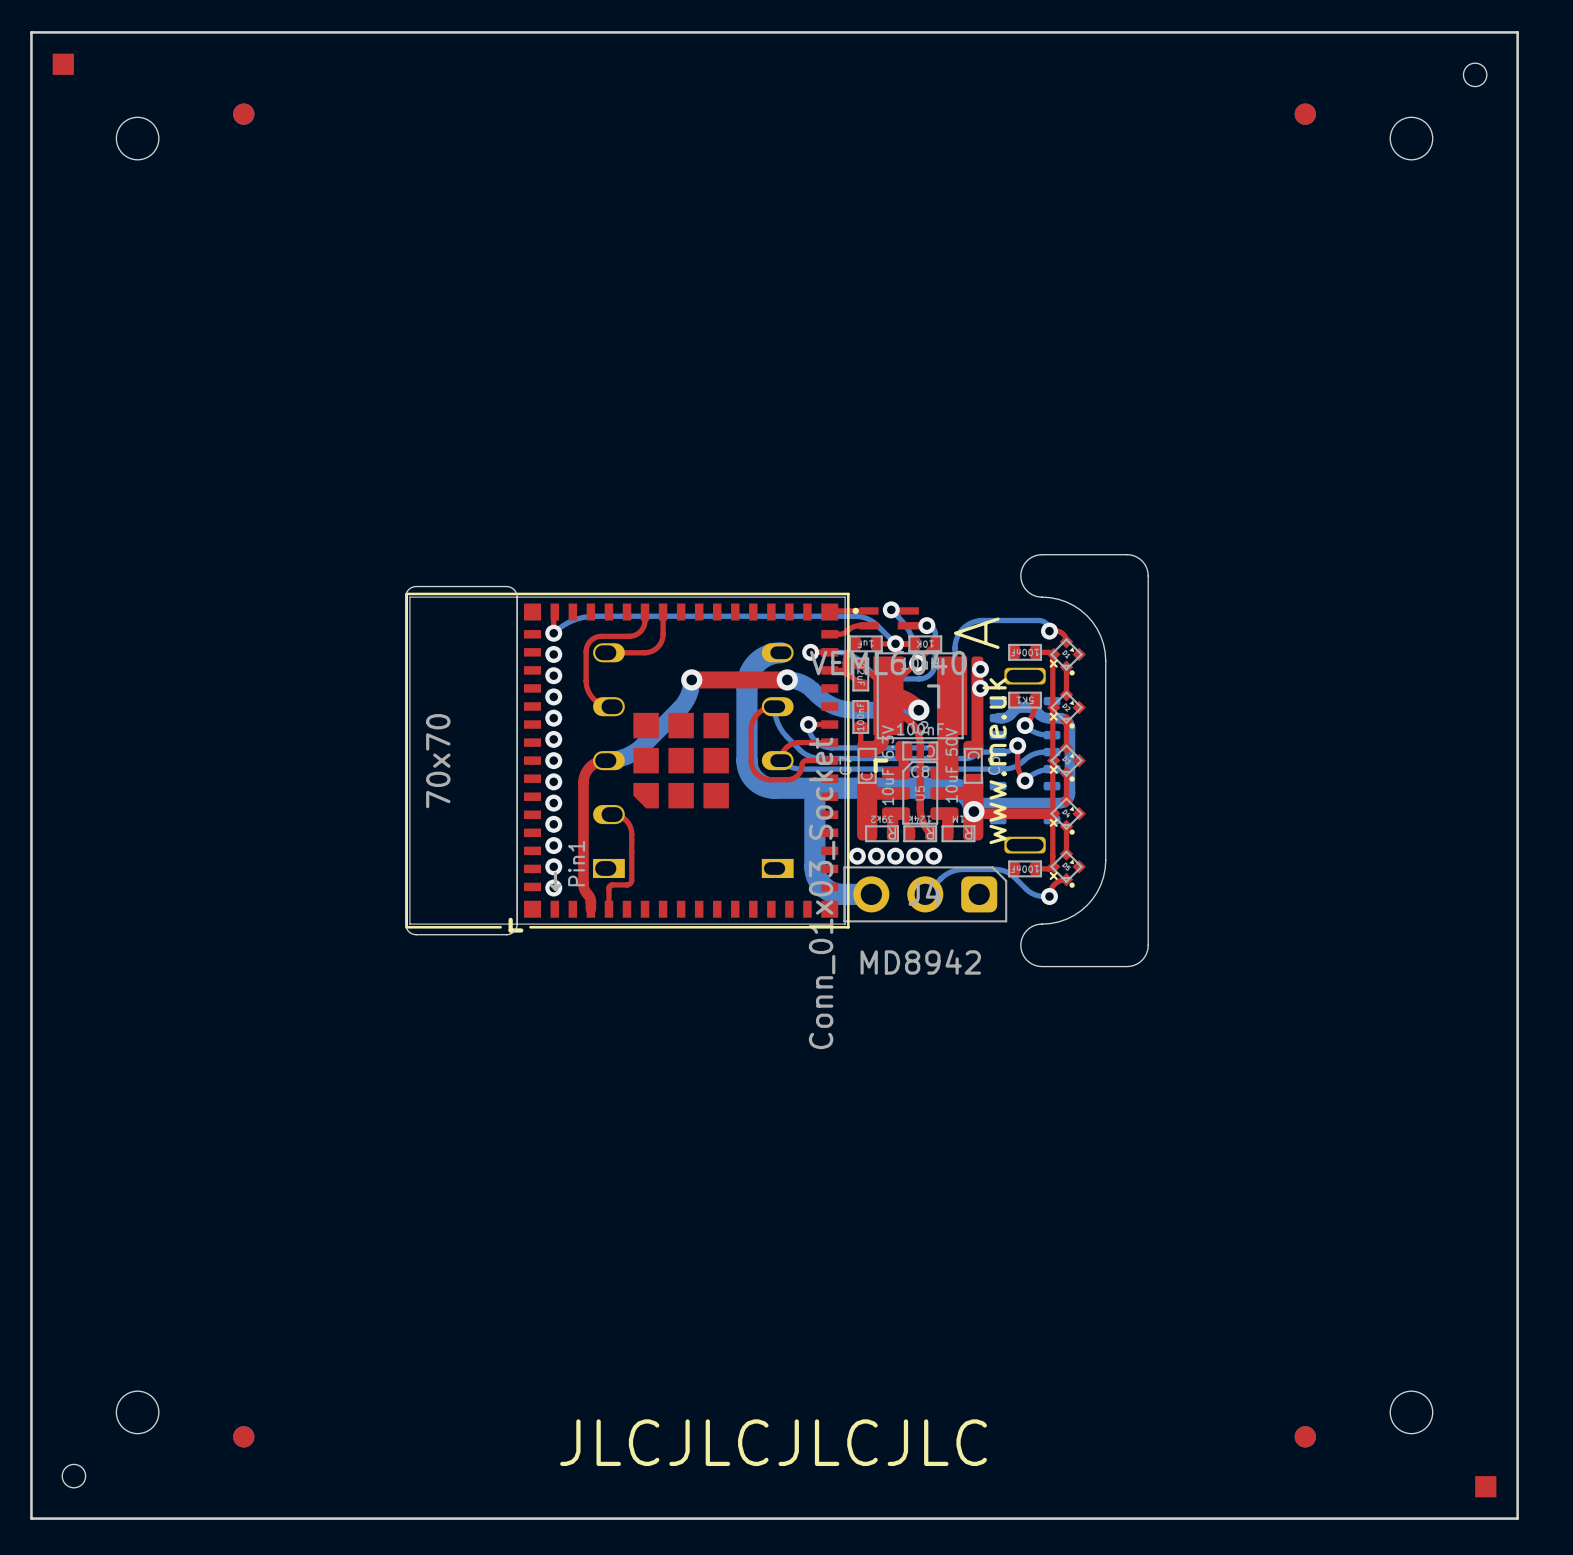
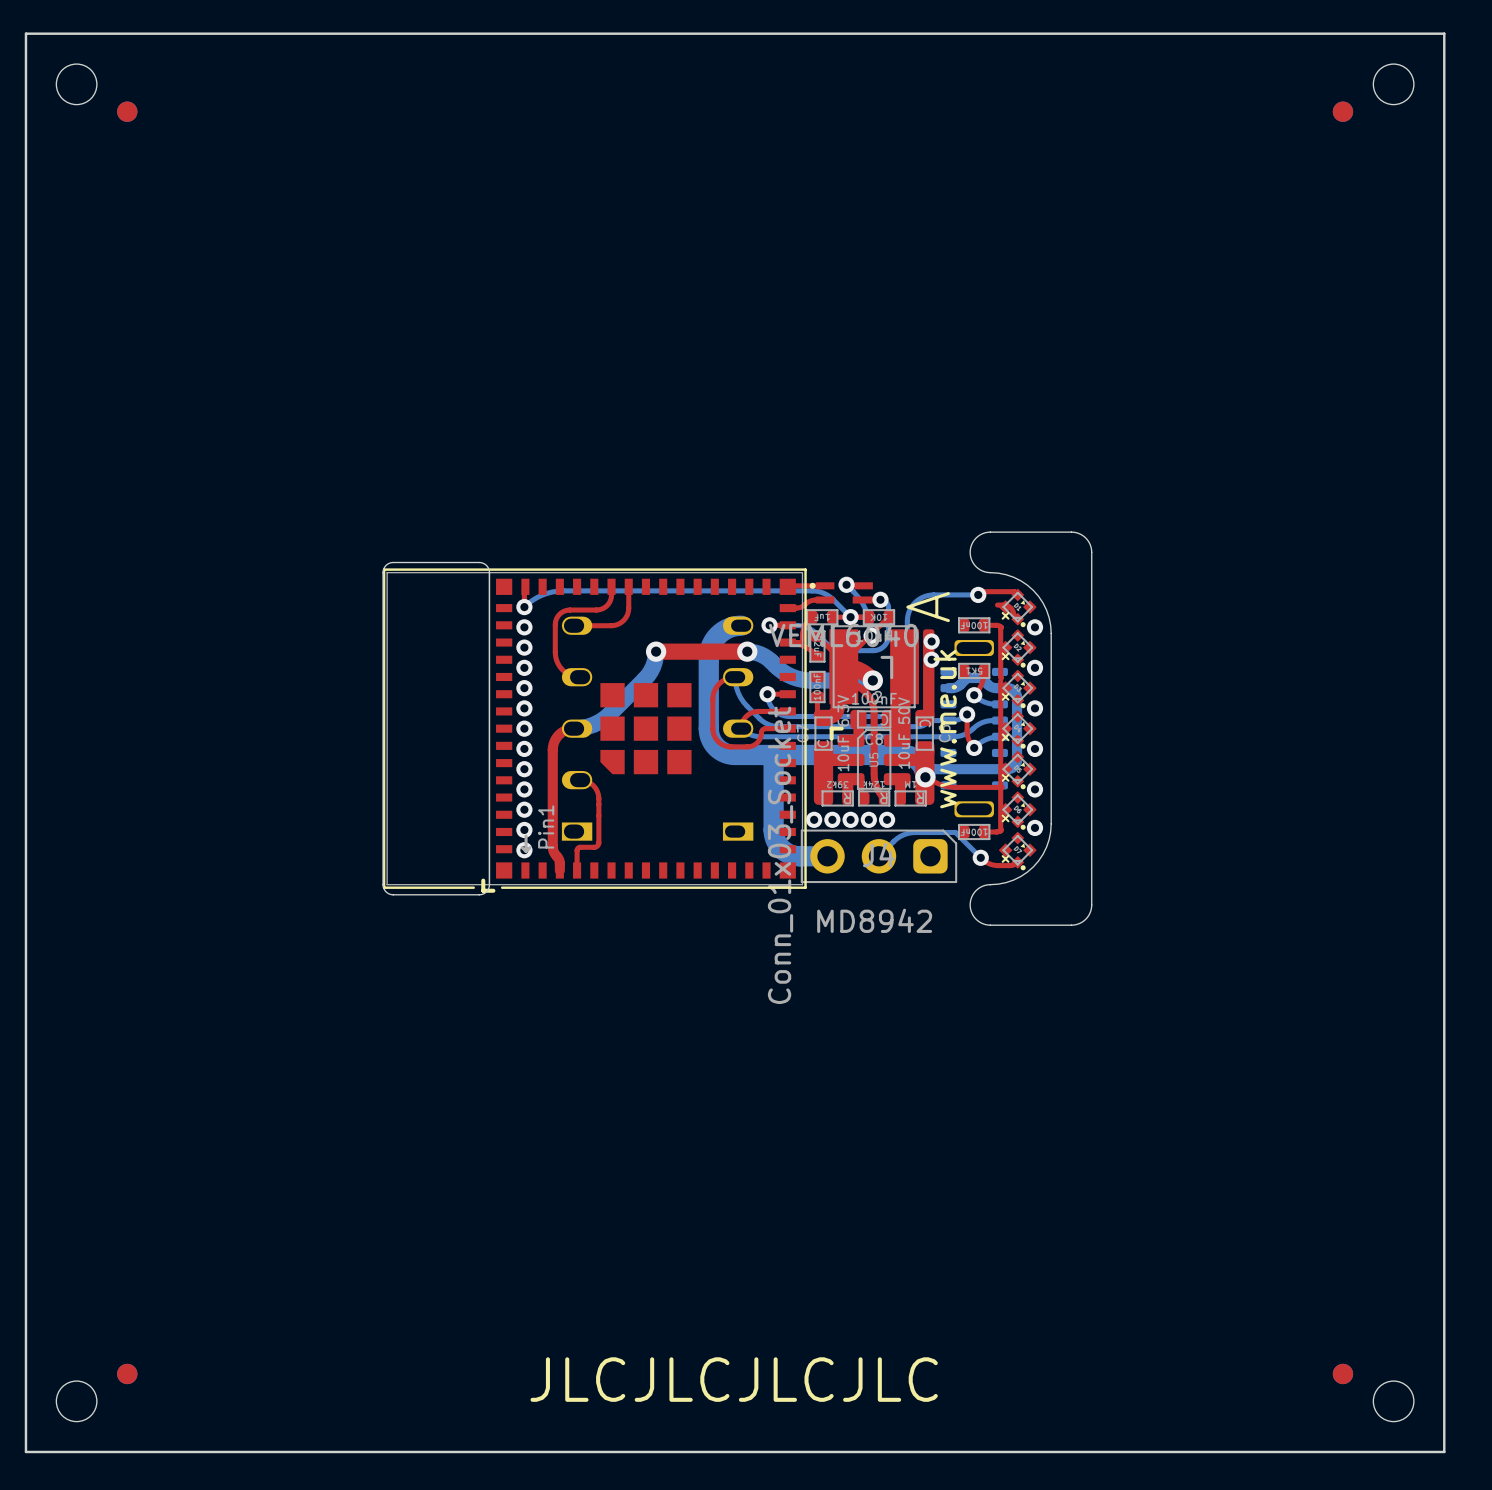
part footprint: [30, 31, 1519, 1520] -> [24, 32, 1446, 1454]
top track: none -> (978, 594) (981, 591) (1014, 591) (1017, 594)
bottom track: (1029, 620) (1044, 621) (1049, 631) -> none
via: none -> (978, 594)
via: (1049, 631) -> none
part footprint: [1046, 634, 1086, 676] -> [999, 588, 1037, 628]
via: none -> (1034, 627)
top track: (1066, 669) (1066, 696) -> none
part footprint: [1046, 688, 1086, 729] -> [999, 629, 1037, 668]
via: none -> (1034, 667)
top track: (1066, 722) (1066, 747) -> none
via: none -> (1034, 708)
part footprint: [1046, 741, 1086, 782] -> [999, 669, 1037, 709]
part value: 70x70 (438, 761) -> none
top track: (1066, 773) (1066, 803) -> none
via: none -> (1034, 748)
part footprint: [1046, 794, 1086, 835] -> [999, 710, 1037, 749]
top track: none -> (924, 774) (935, 782) (947, 786) (1002, 787)
top track: (973, 811) (979, 813) (1053, 813) -> none
via: none -> (1034, 789)
top track: (1066, 828) (1066, 856) -> none
part: none -> (1017, 810)
part footprint: [1046, 847, 1086, 888] -> [999, 750, 1037, 790]
via: none -> (1034, 827)
bottom track: (995, 869) (1010, 873) (1031, 893) (1049, 896) -> (945, 832) (955, 832) (980, 857)
top track: (1066, 879) (1054, 884) (1049, 896) -> none
part: none -> (1017, 851)
top track: none -> (980, 857) (987, 862) (996, 865) (1011, 865) (1017, 862)
via position: (1049, 896) -> (980, 857)

